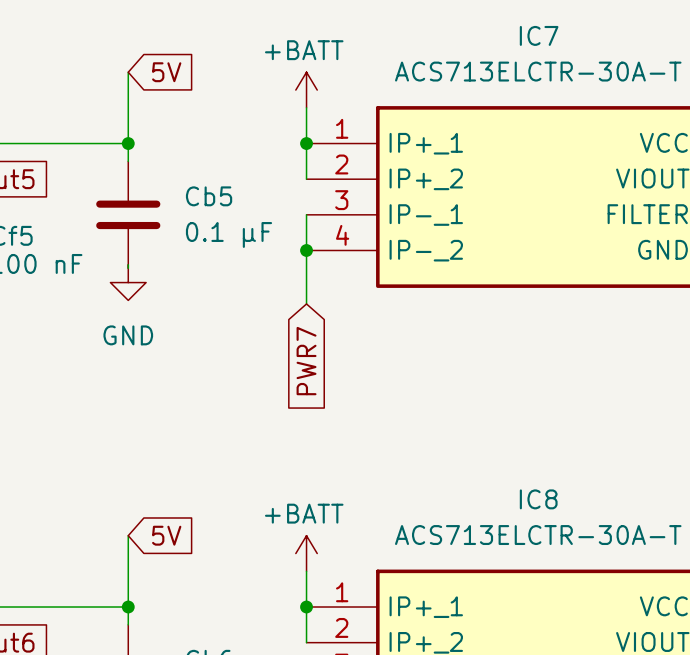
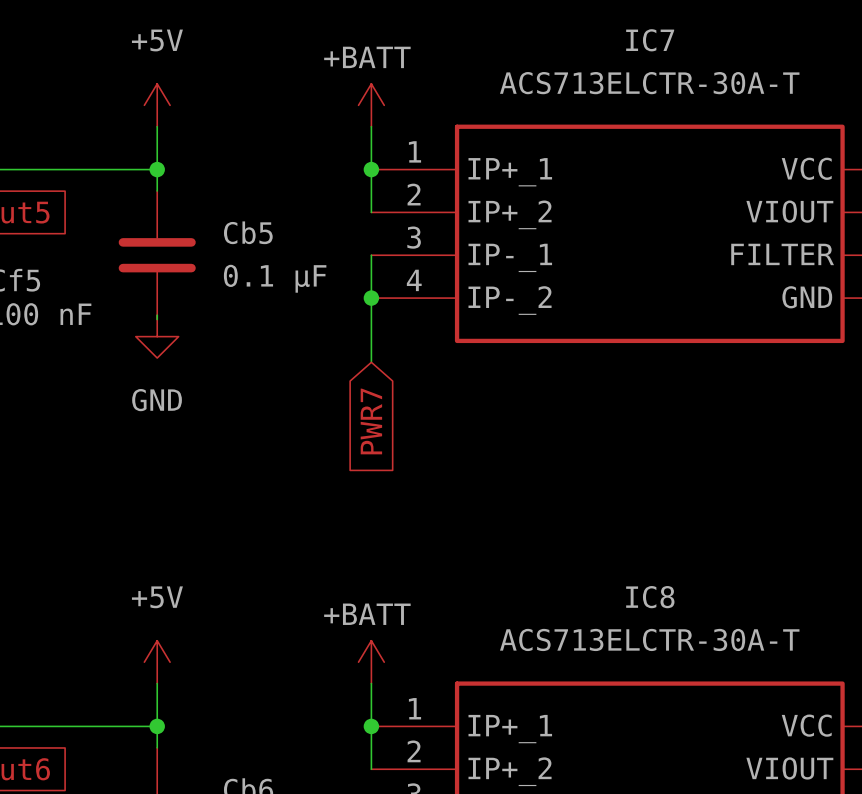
global label: 5V (166, 72) -> none
power symbol: none -> +5V (157, 105)
global label: 5V (166, 535) -> none
power symbol: none -> +5V (157, 662)

